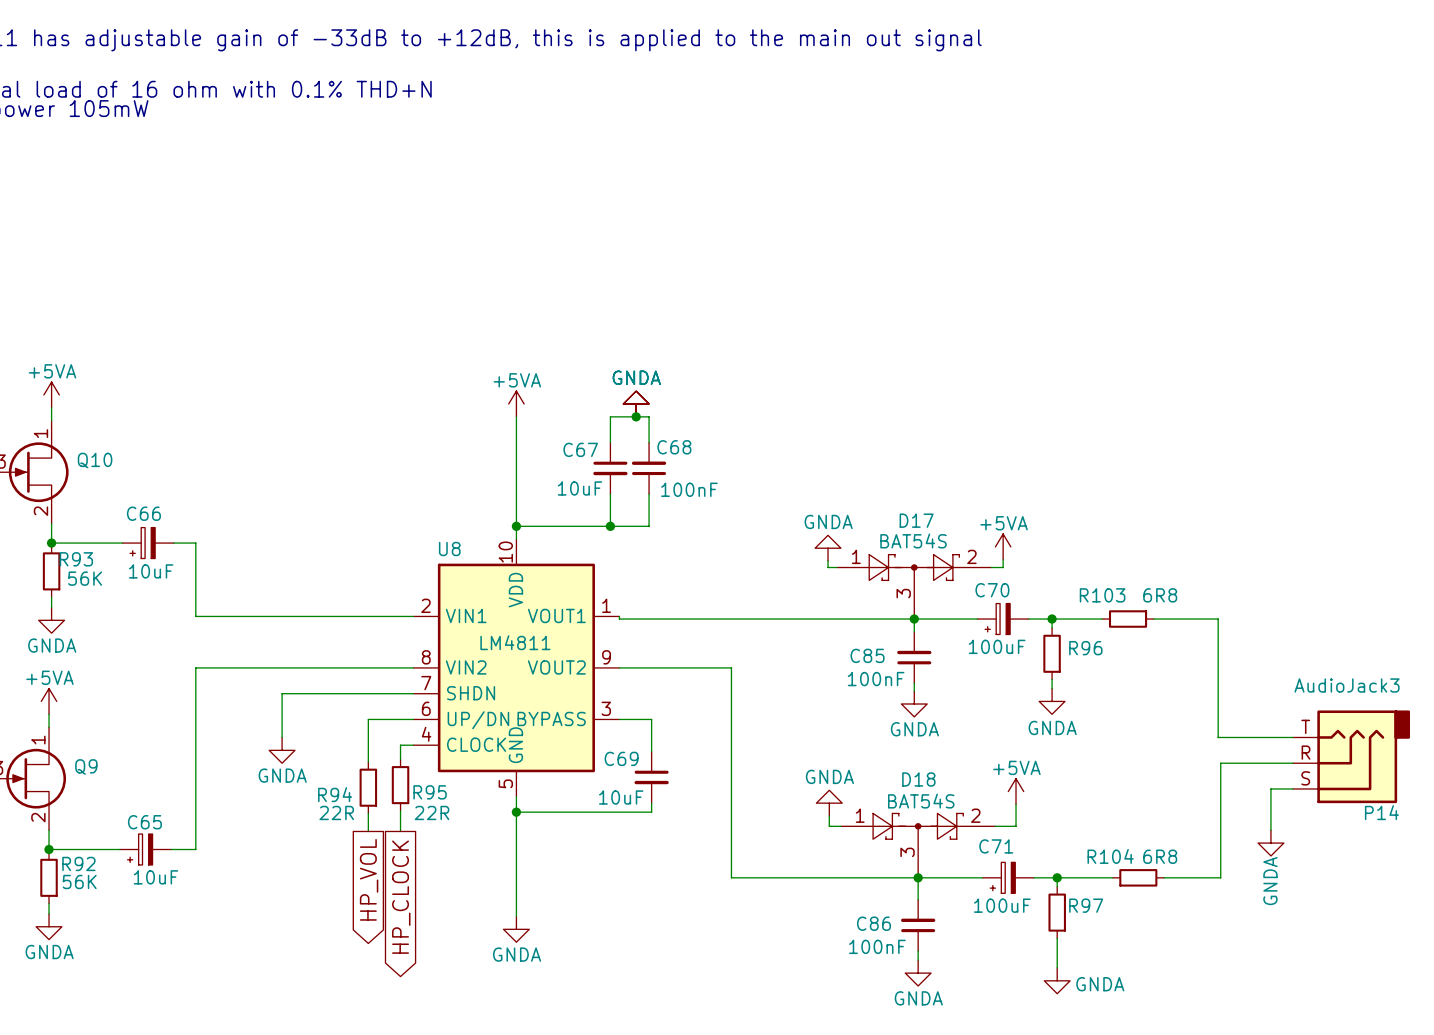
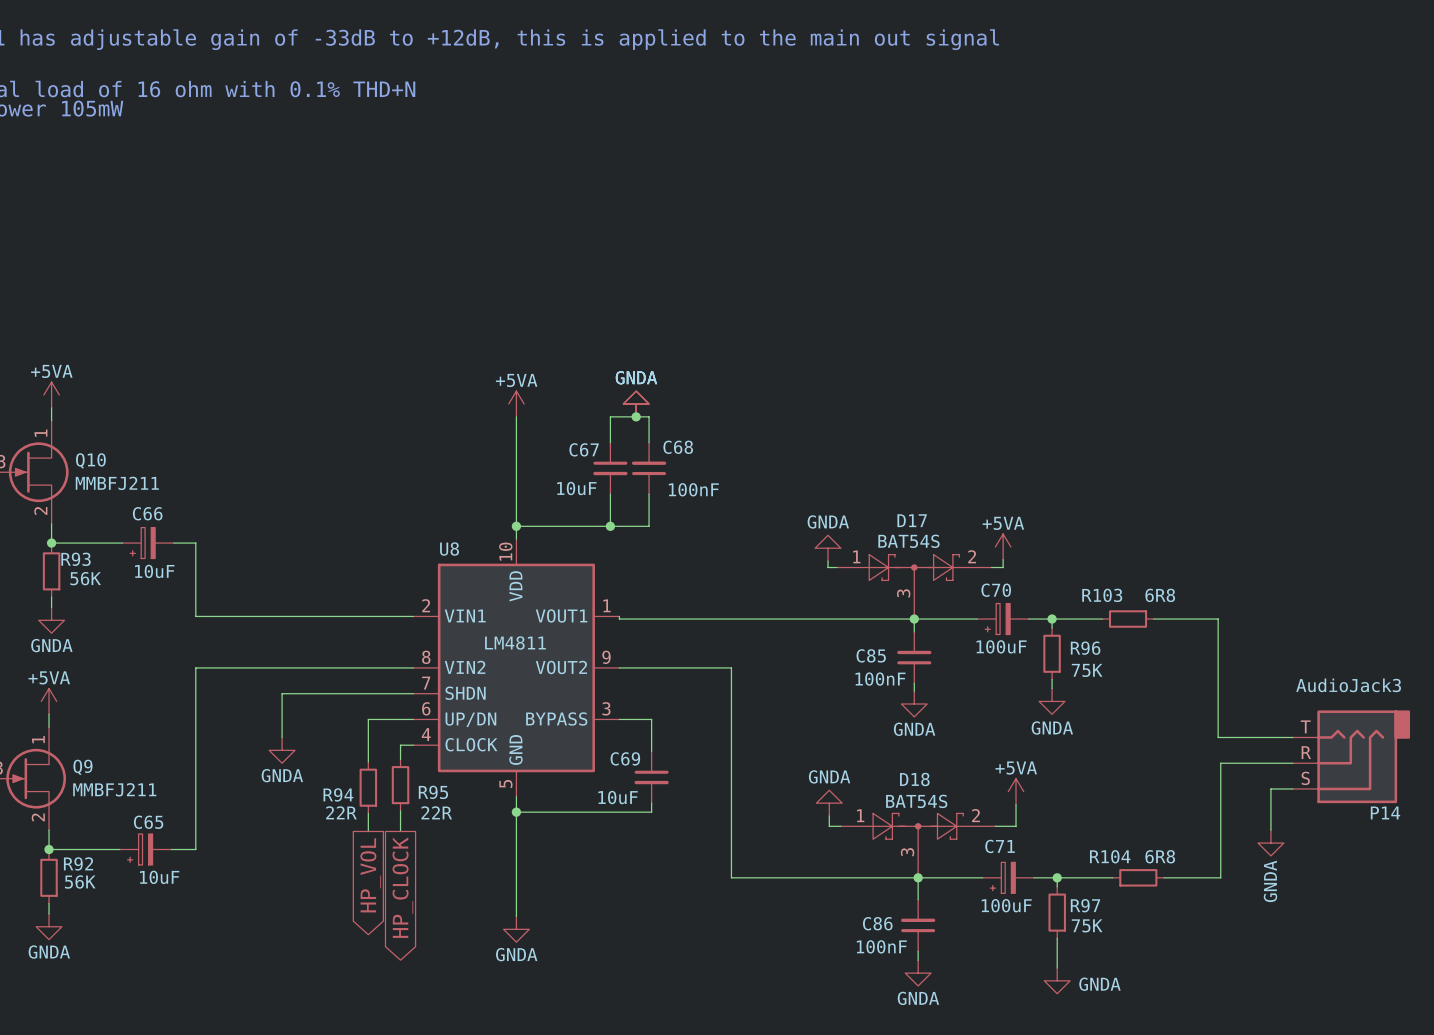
Q10 value: none -> MMBFJ211 (117, 483)
R96 value: none -> 75K (1087, 670)
Q9 value: none -> MMBFJ211 (114, 789)
R97 value: none -> 75K (1087, 925)

